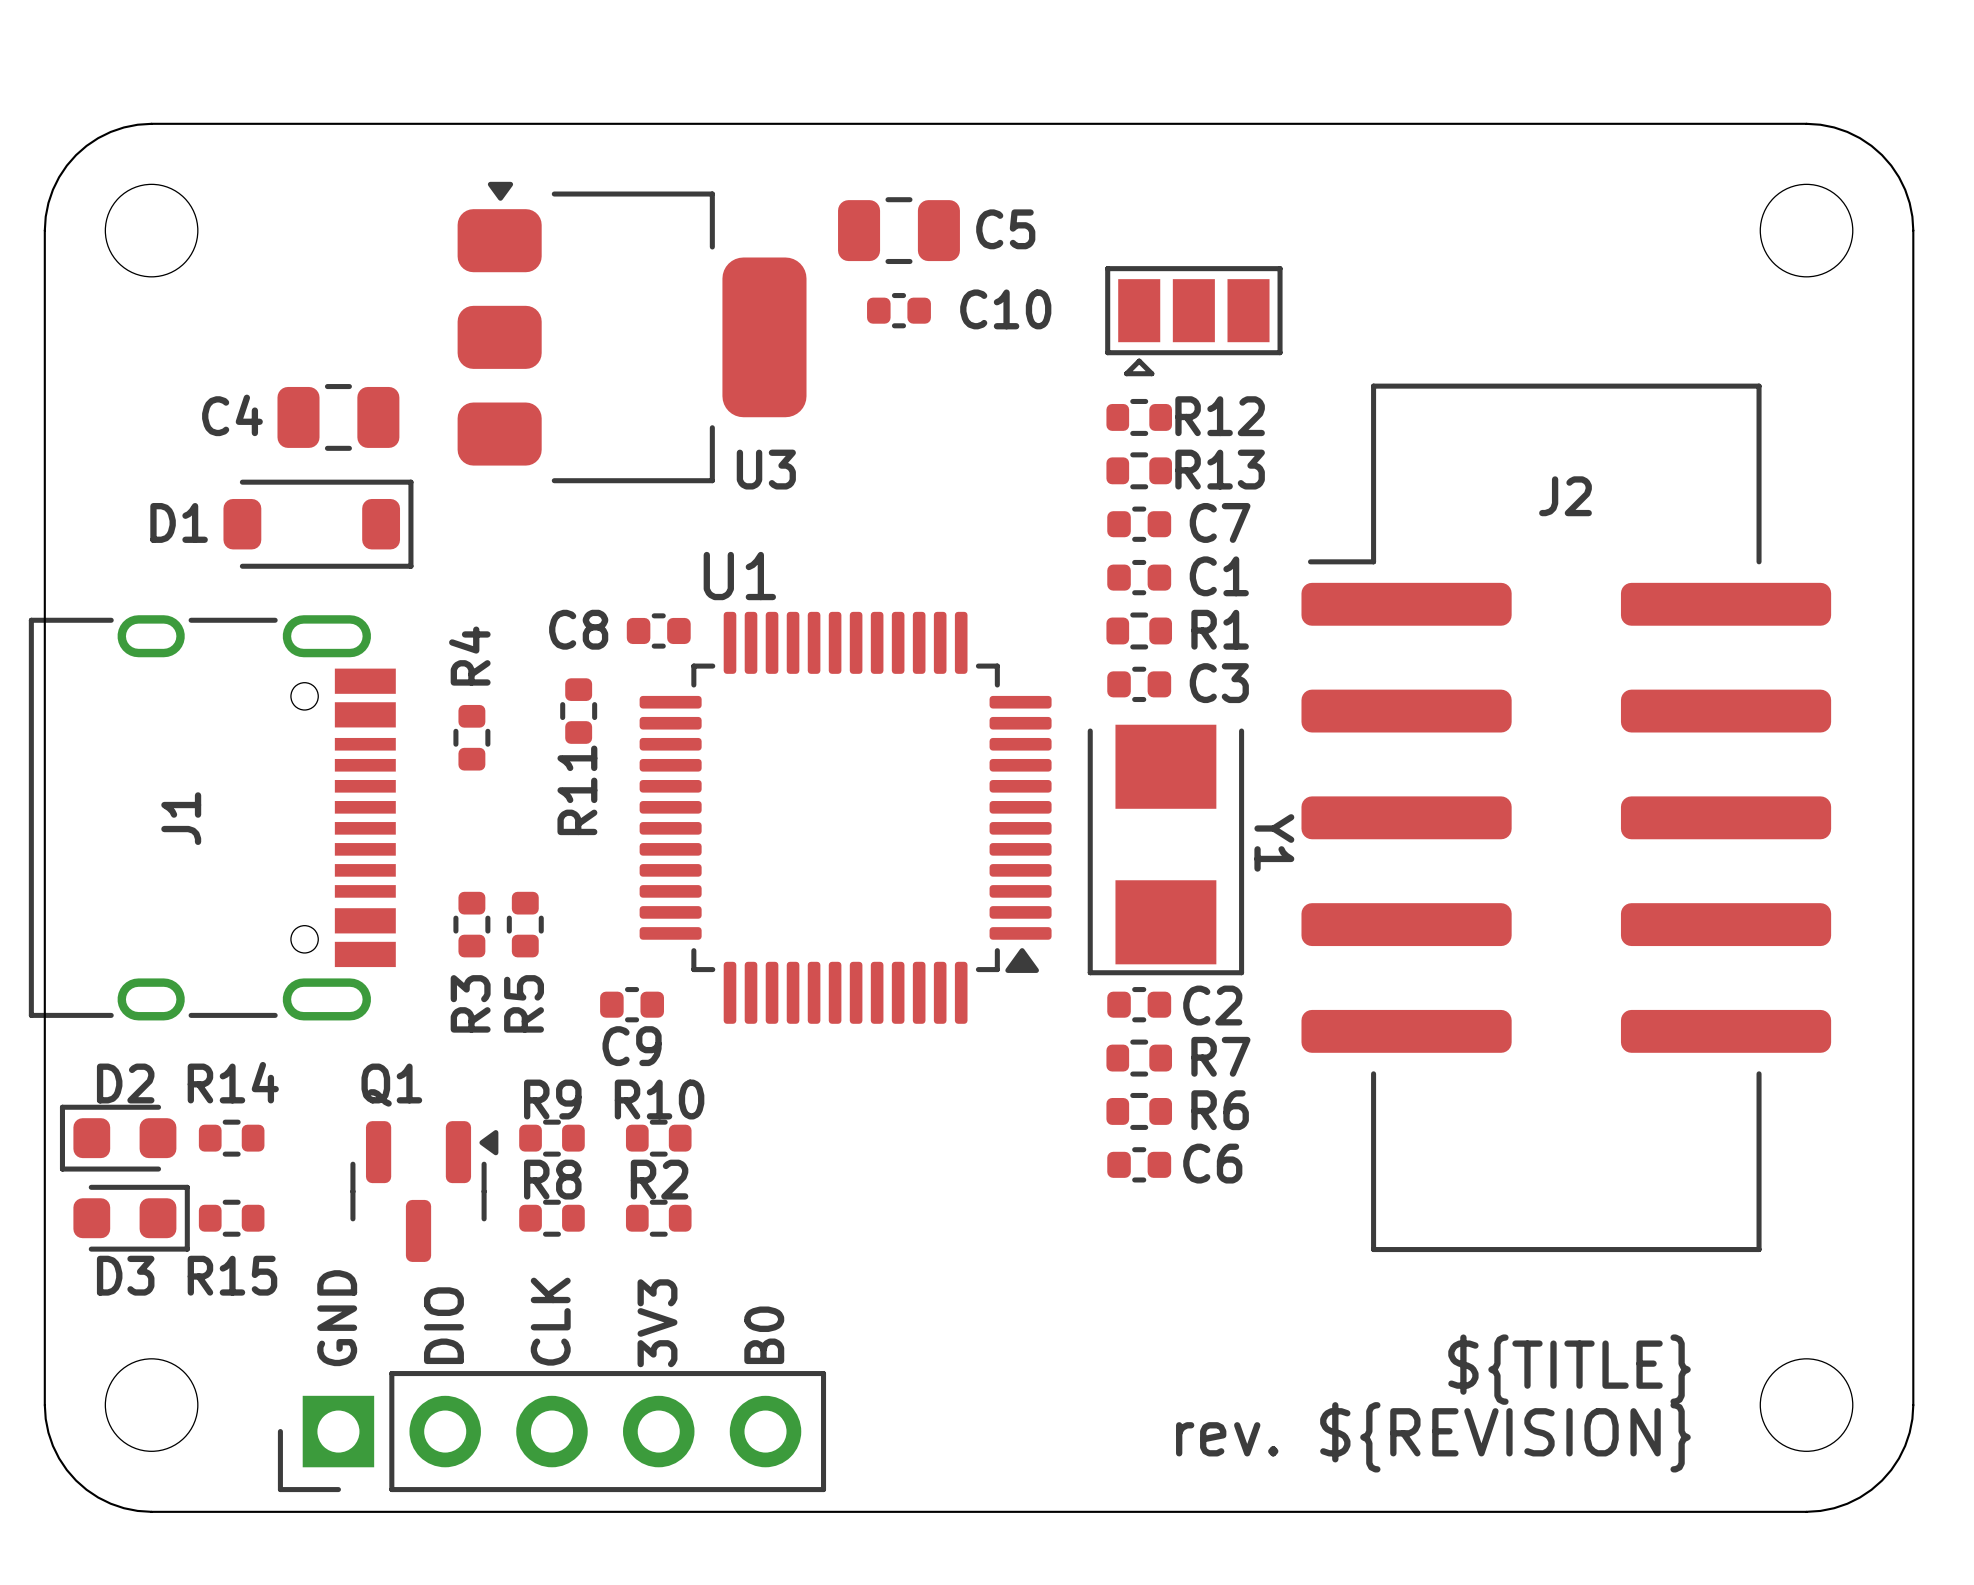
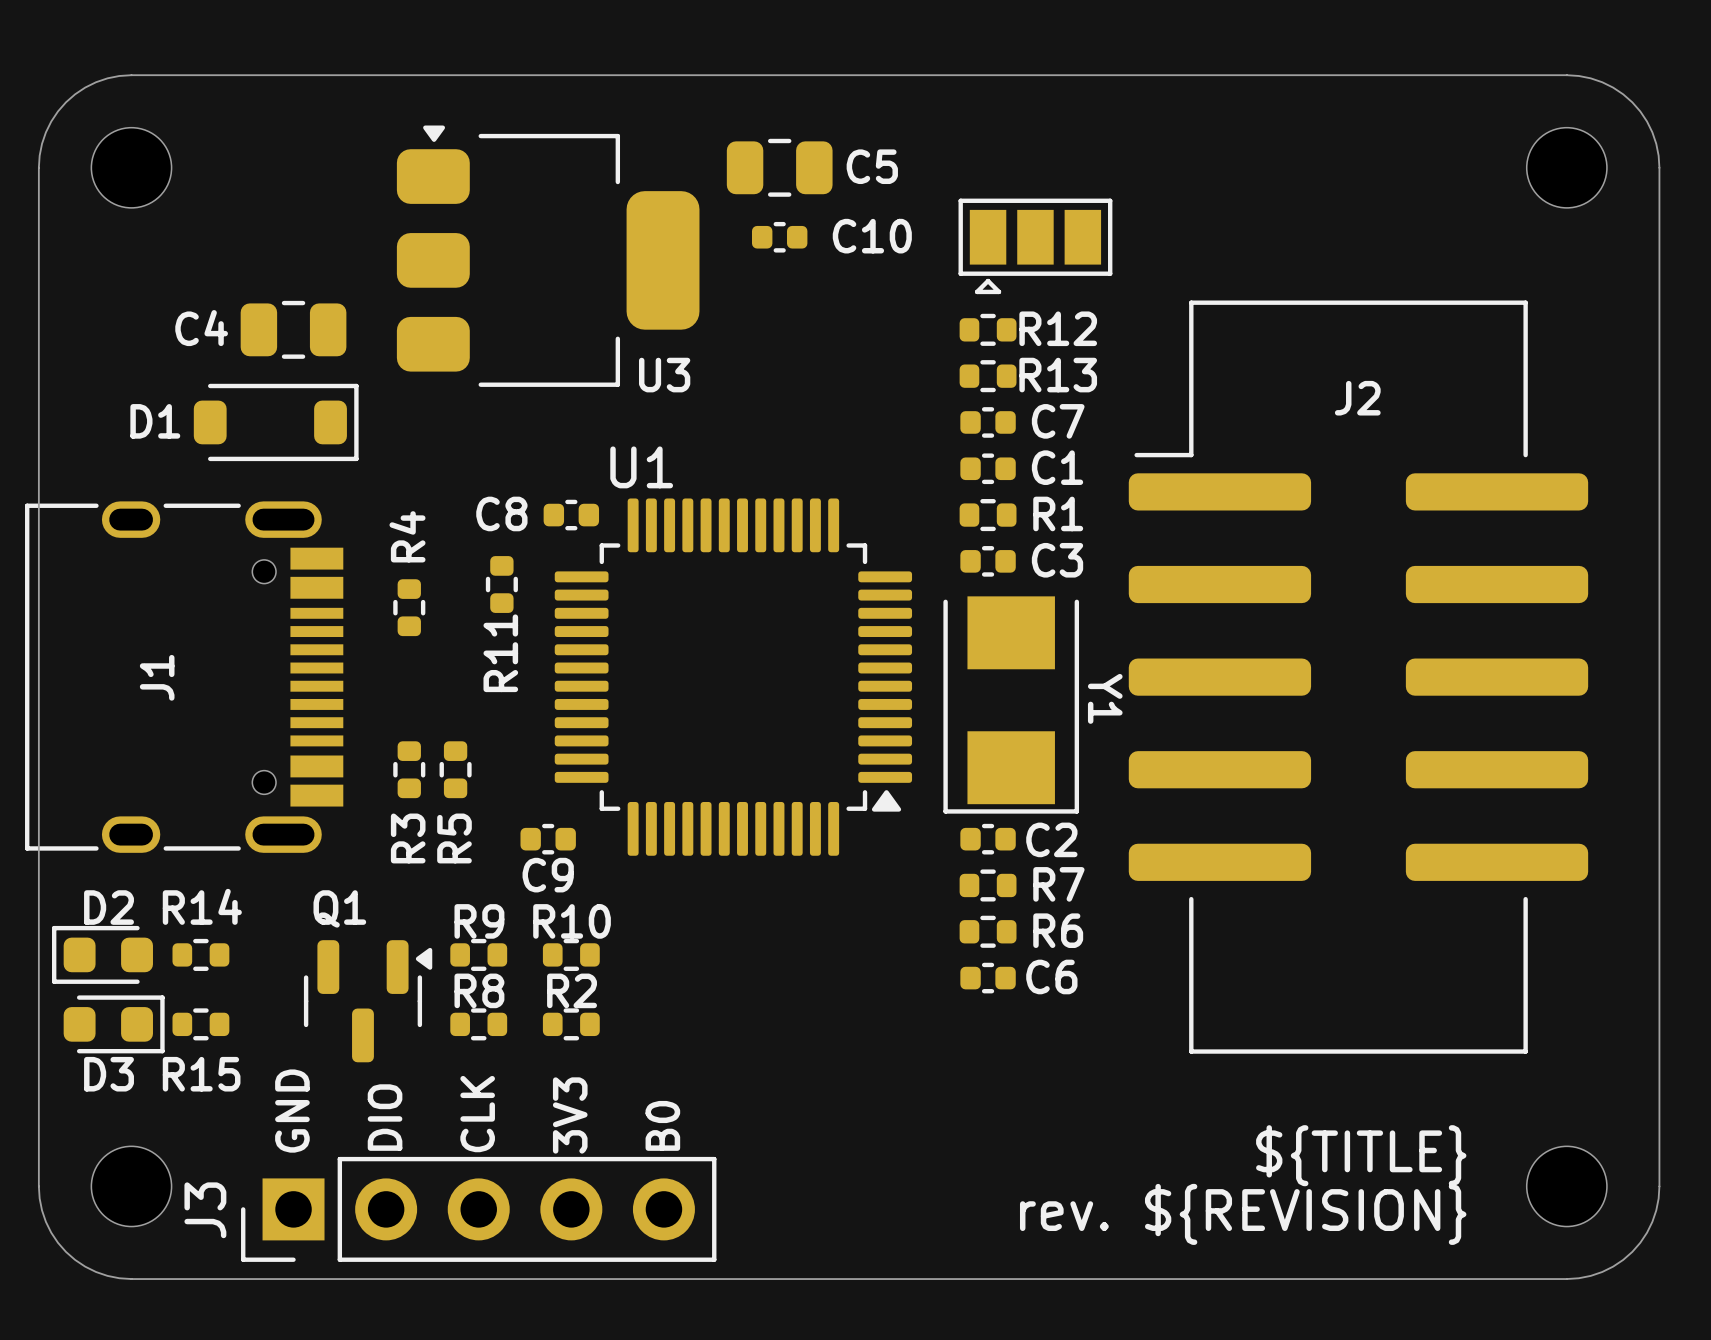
J3 name: none -> J3 (205, 1210)

